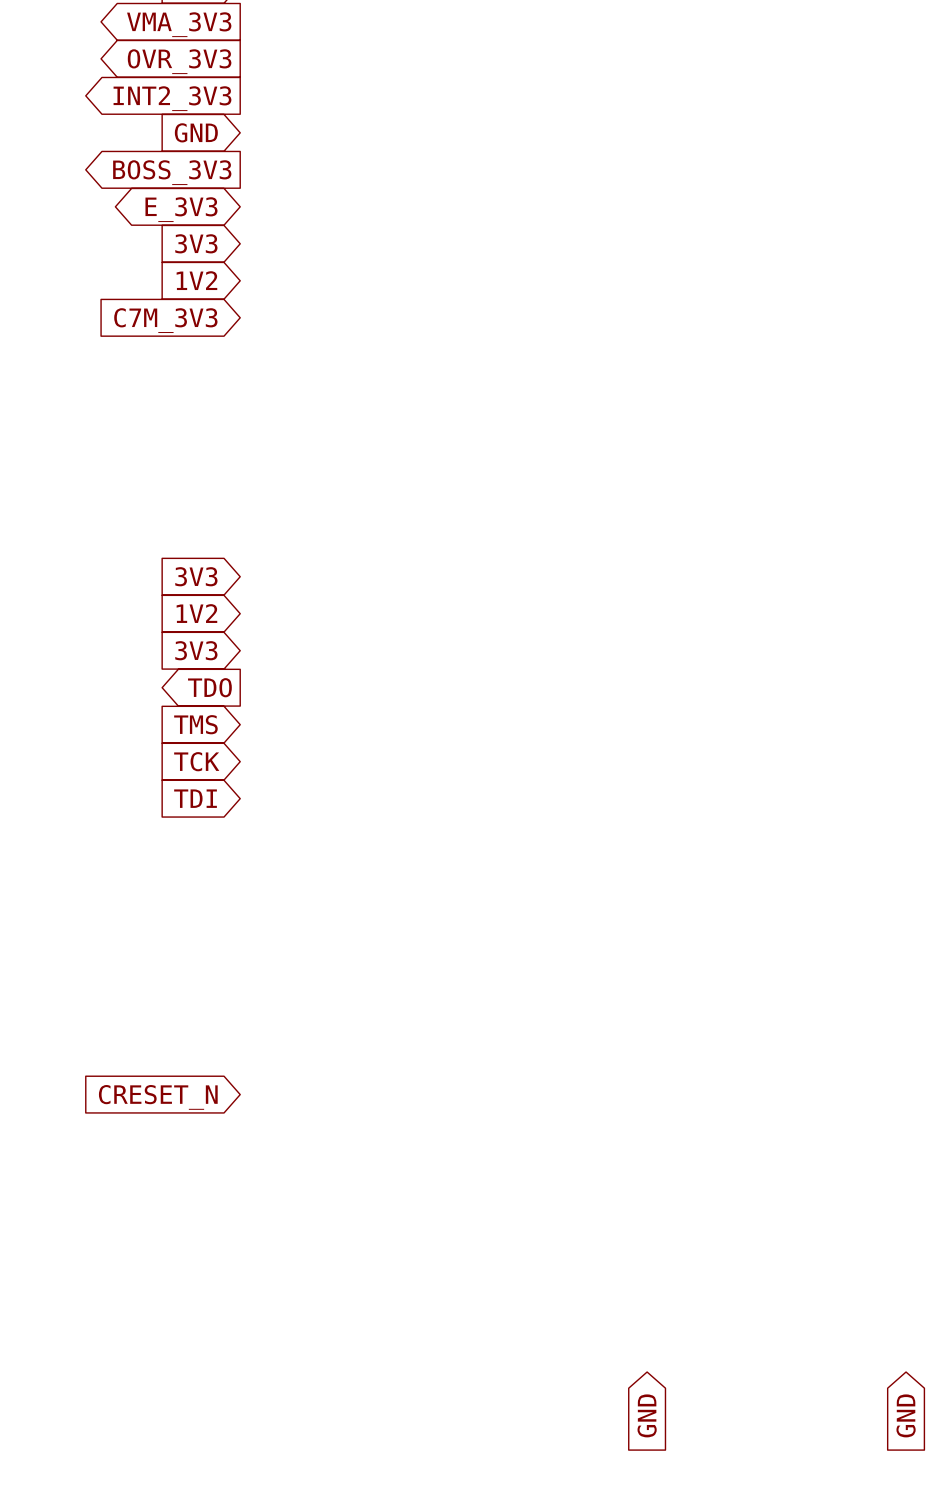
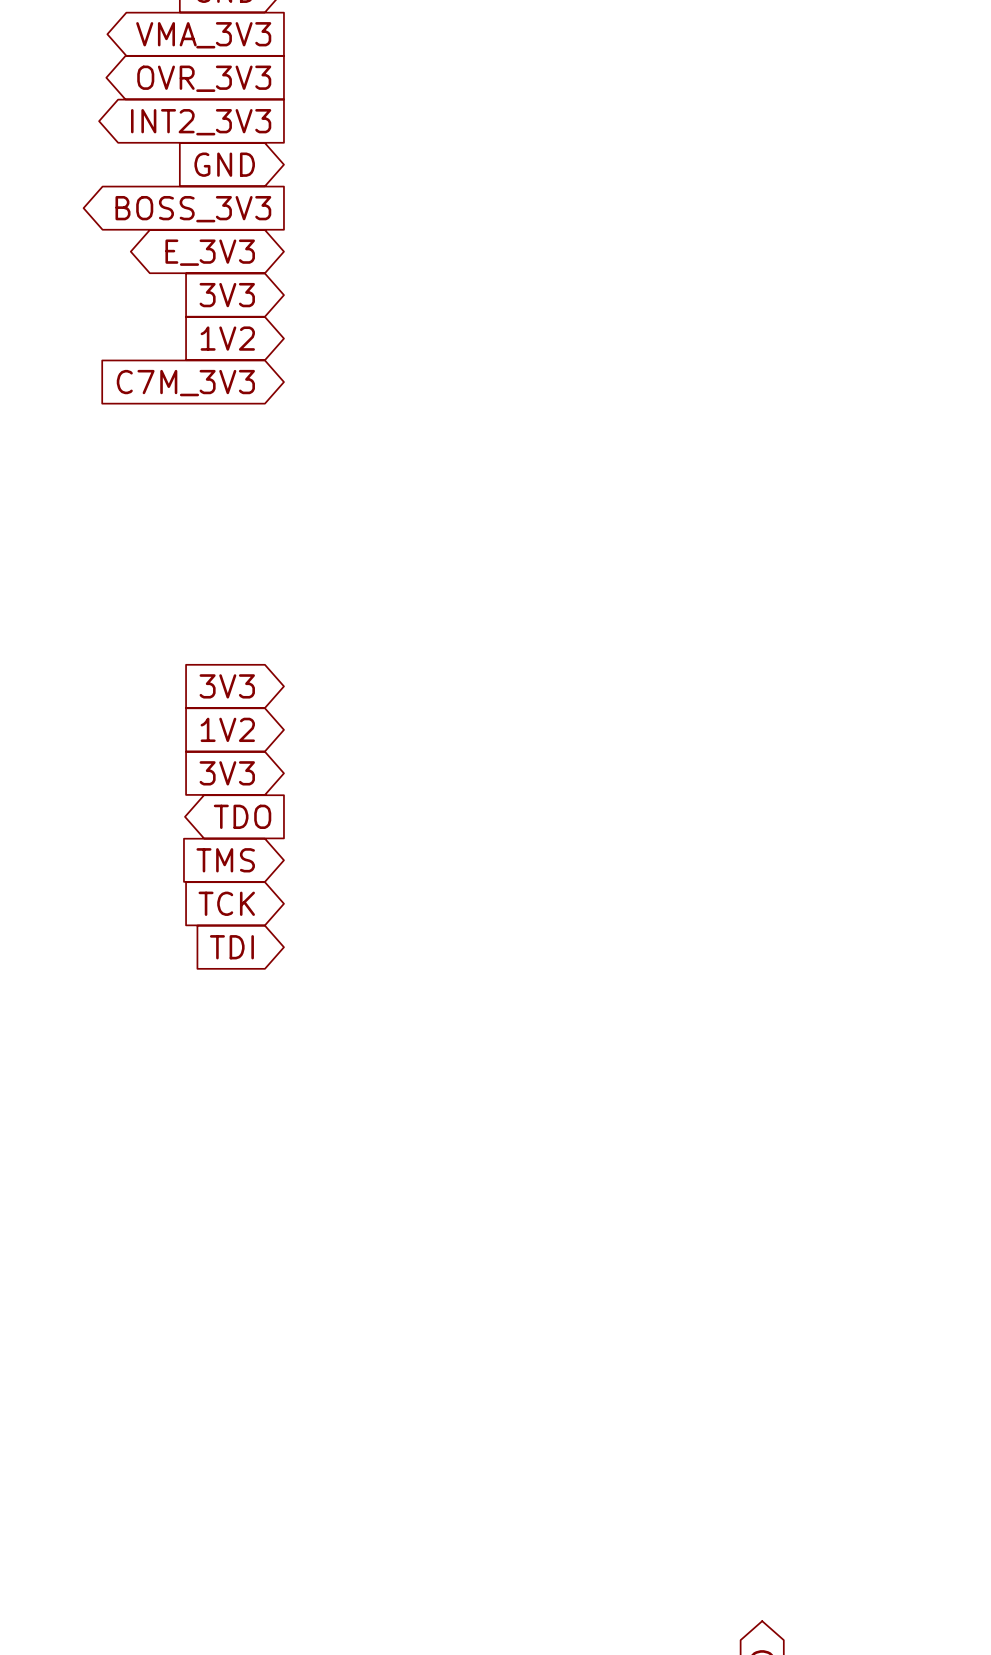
global label: CRESET_N (158, 1097) -> none

